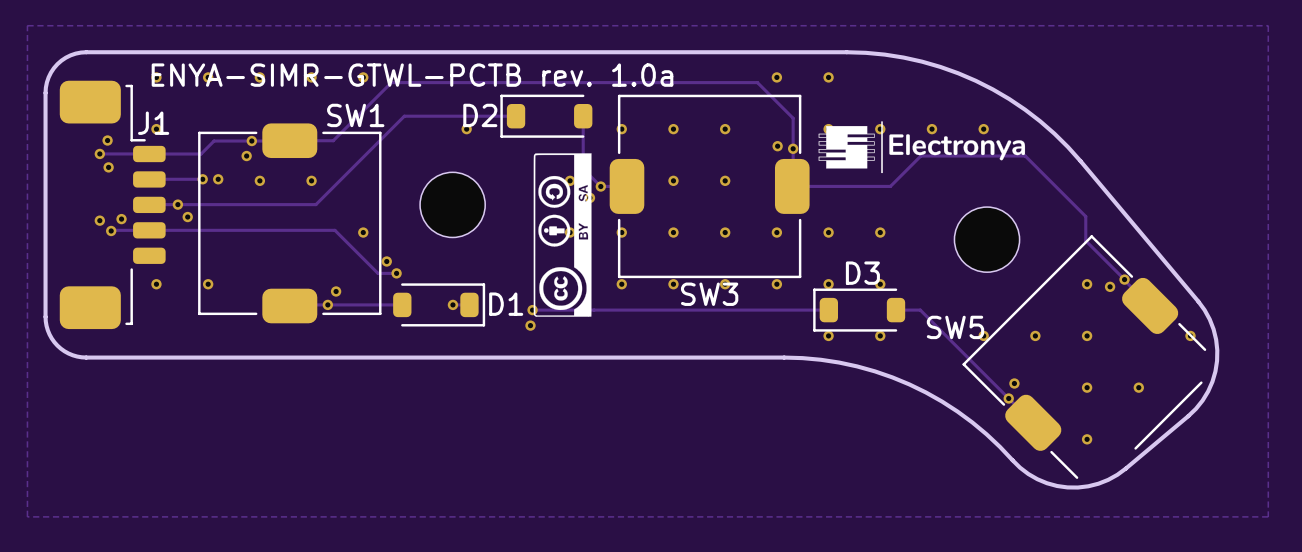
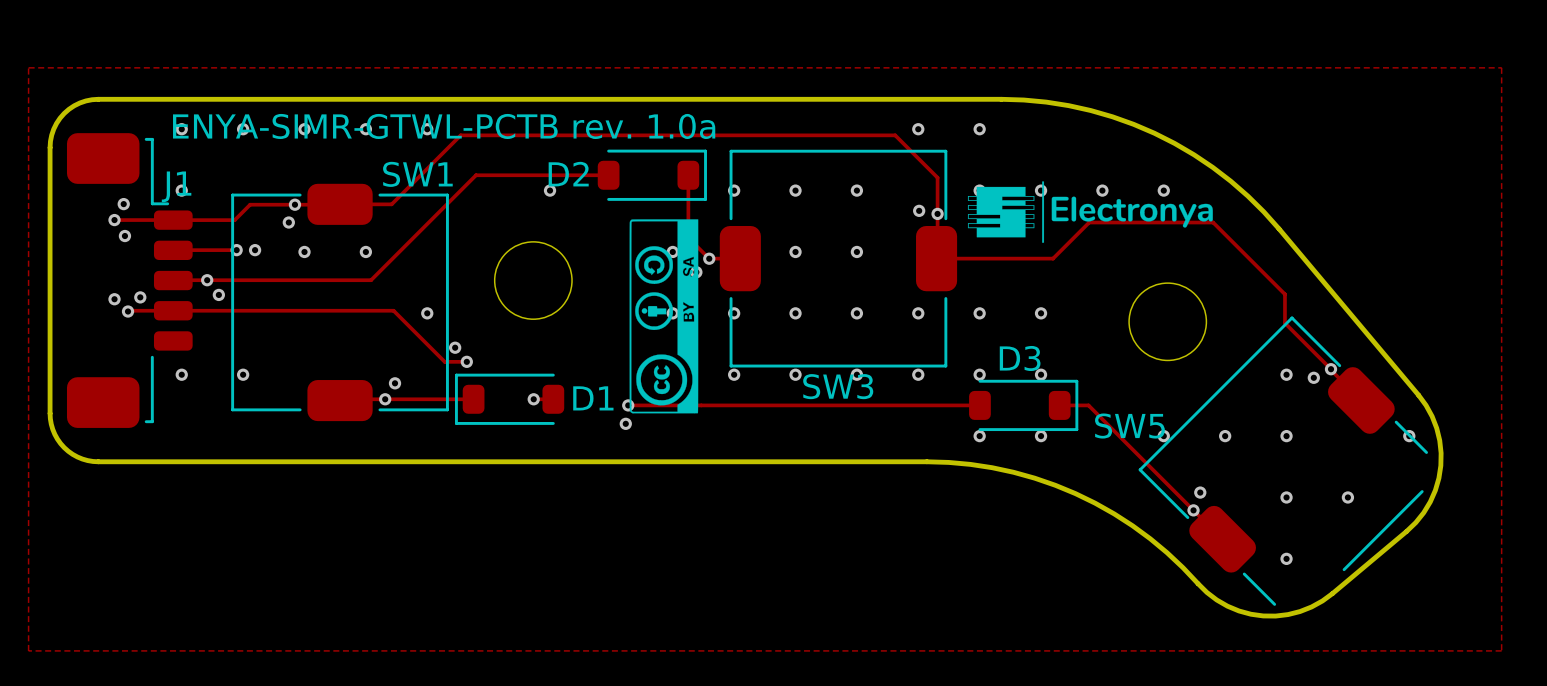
D2 rotation: 0° (546, 116) -> 180° (652, 175)
D1 rotation: 0° (439, 304) -> 180° (509, 399)
D3 rotation: 0° (859, 310) -> 180° (1023, 405)

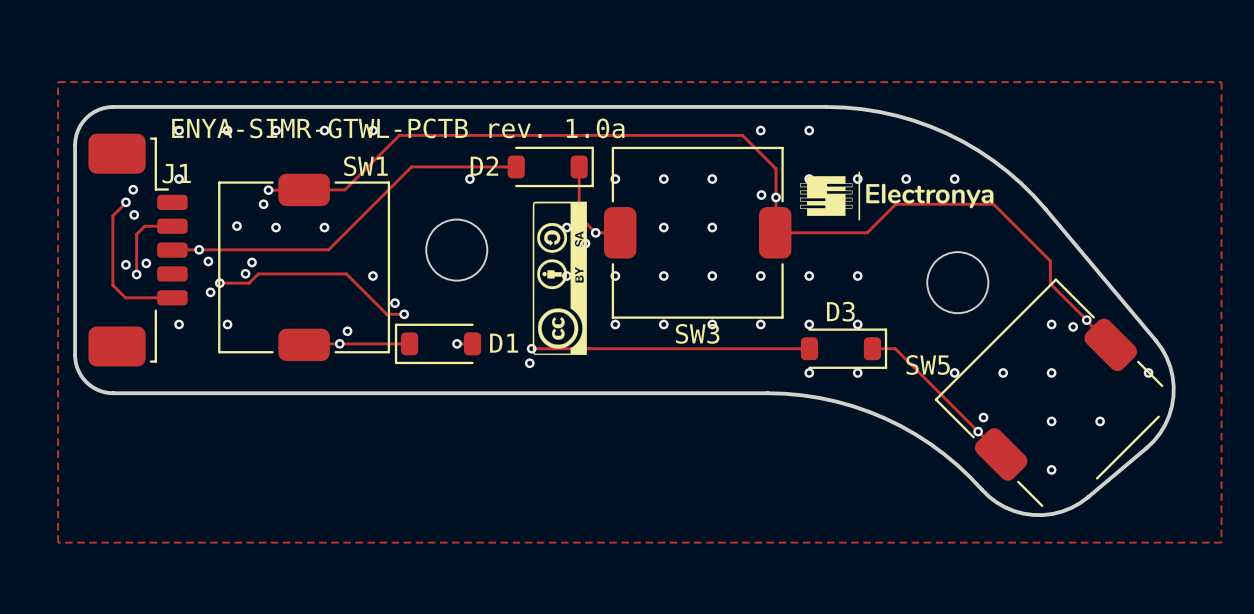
track: (294, 204) (250, 204) (234, 220) (173, 220) -> none
track: (114, 220) (173, 220) -> (126, 202) (112, 215) (112, 285) (125, 297) (172, 297)
track: (173, 250) (236, 250) -> (172, 226) (144, 226) (136, 234) (136, 274)
via: (236, 250) -> none
via: none -> (252, 262)
via: none -> (245, 273)
track: (282, 310) (128, 311) -> (258, 273) (249, 283) (219, 283)
via: none -> (219, 283)
via: none -> (210, 292)

